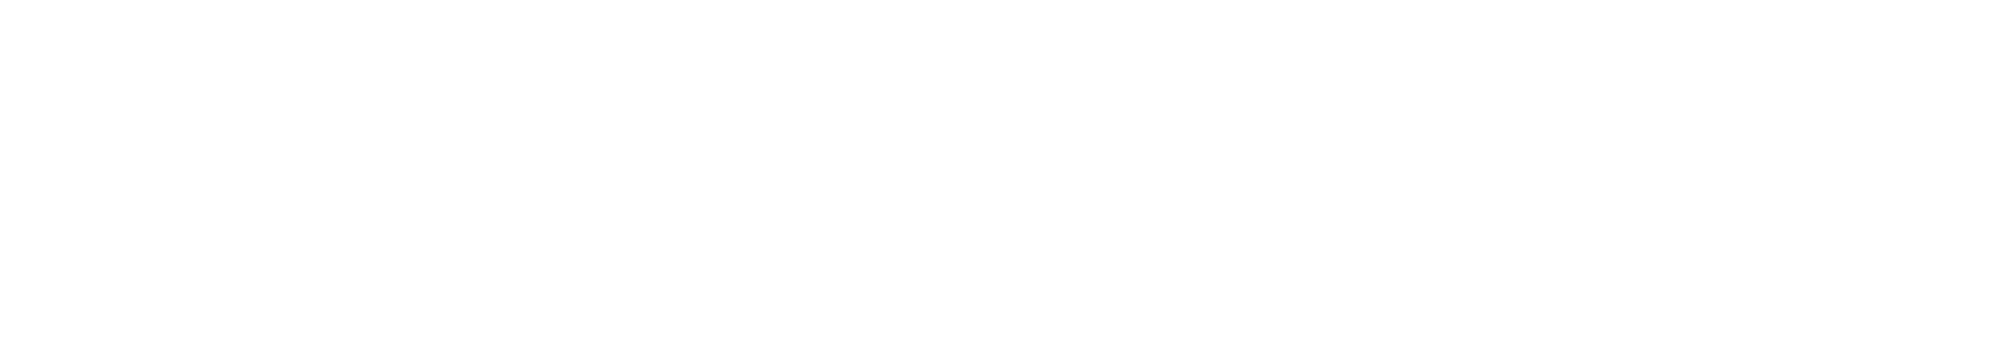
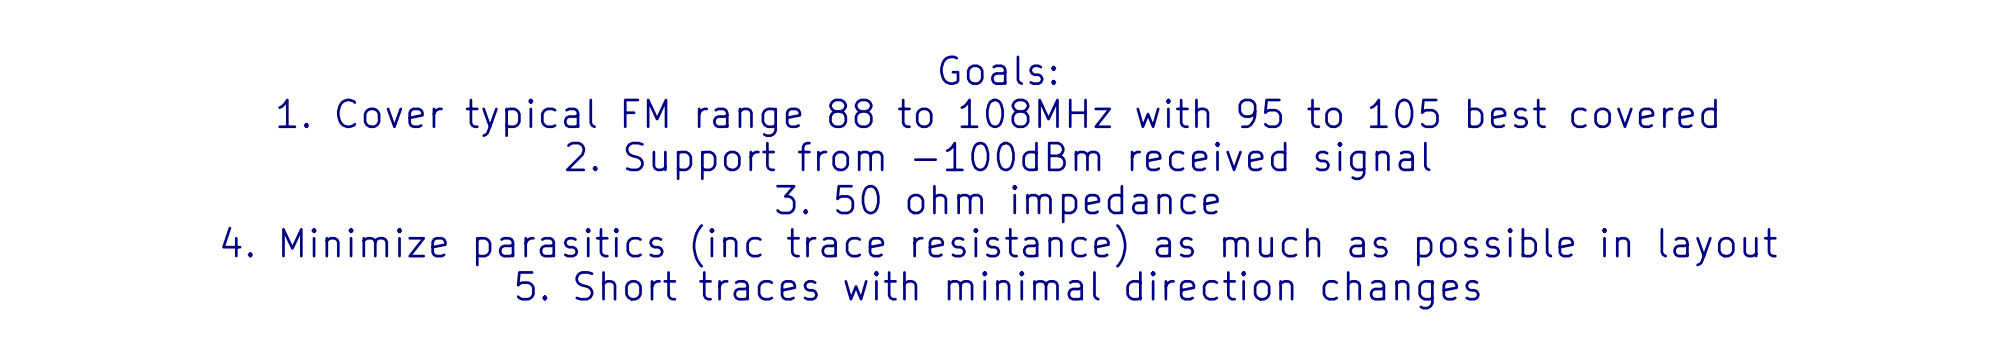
text: none -> Goals: (998, 70)
text: none -> 1. Cover typical FM range 88 to 108MHz with 95 to 105 best covered (997, 117)
text: none -> 2. Support from -100dBm received signal (998, 160)
text: none -> 3. 50 ohm impedance (997, 204)
text: none -> 4. Minimize parasitics (inc trace resistance) as much as possible in layout (999, 245)
text: none -> 5. Short traces with minimal direction changes (998, 290)

